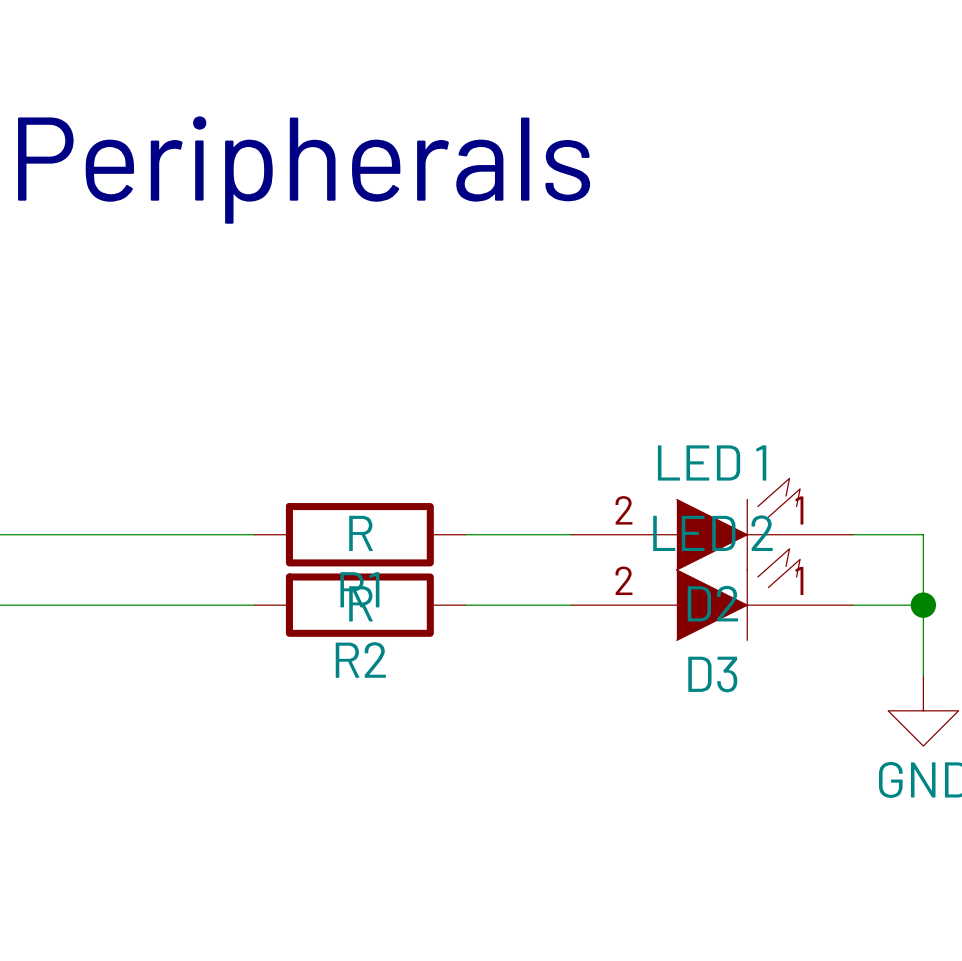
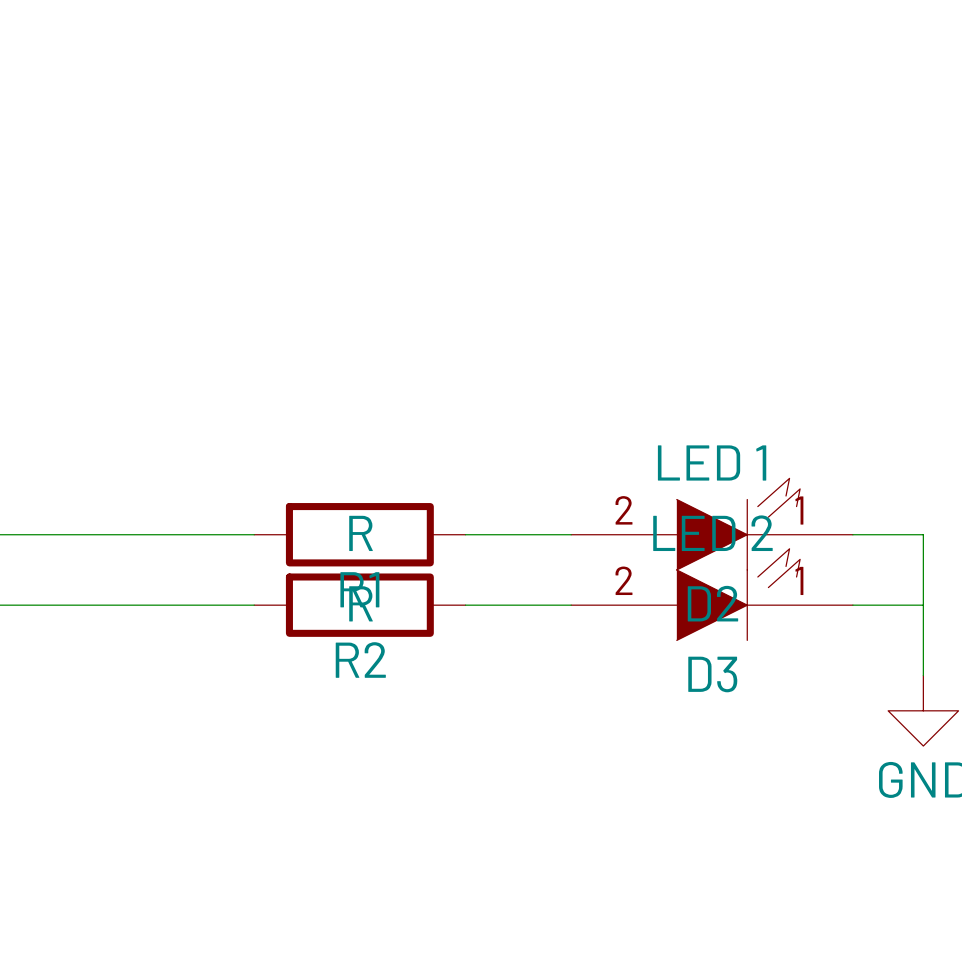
text: Peripherals (304, 170) -> none
junction: (923, 605) -> none

